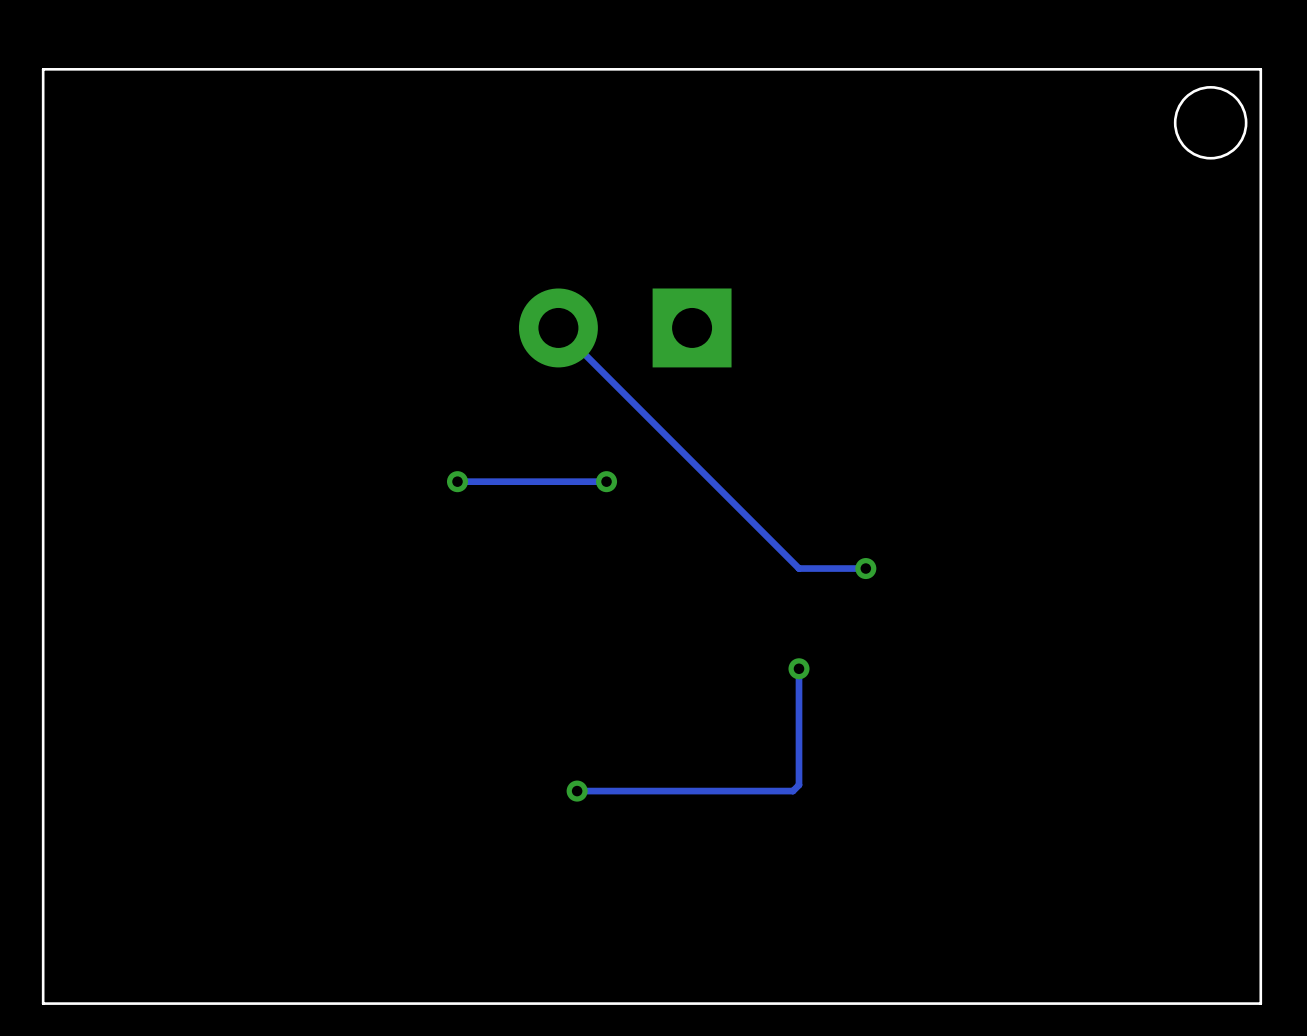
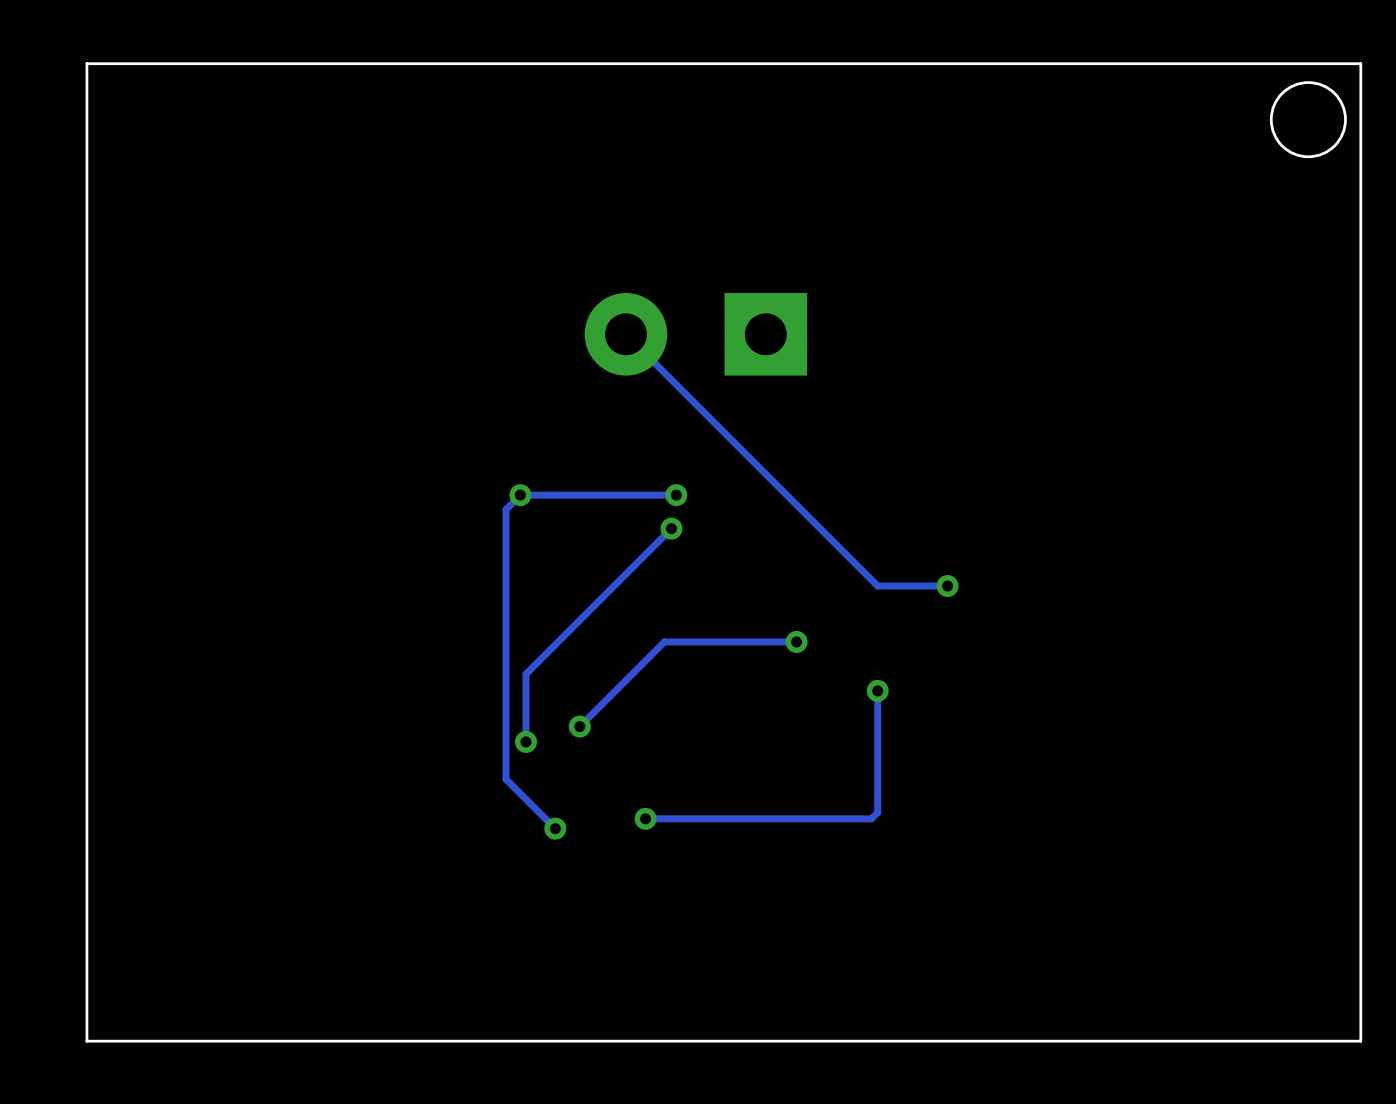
track: none -> (520, 495) (505, 509) (505, 779) (555, 828)
track: none -> (671, 528) (526, 674) (526, 741)
via: none -> (671, 528)
track: none -> (796, 641) (664, 641) (579, 726)
via: none -> (796, 641)
via: none -> (579, 726)
via: none -> (526, 741)
via: none -> (555, 828)

